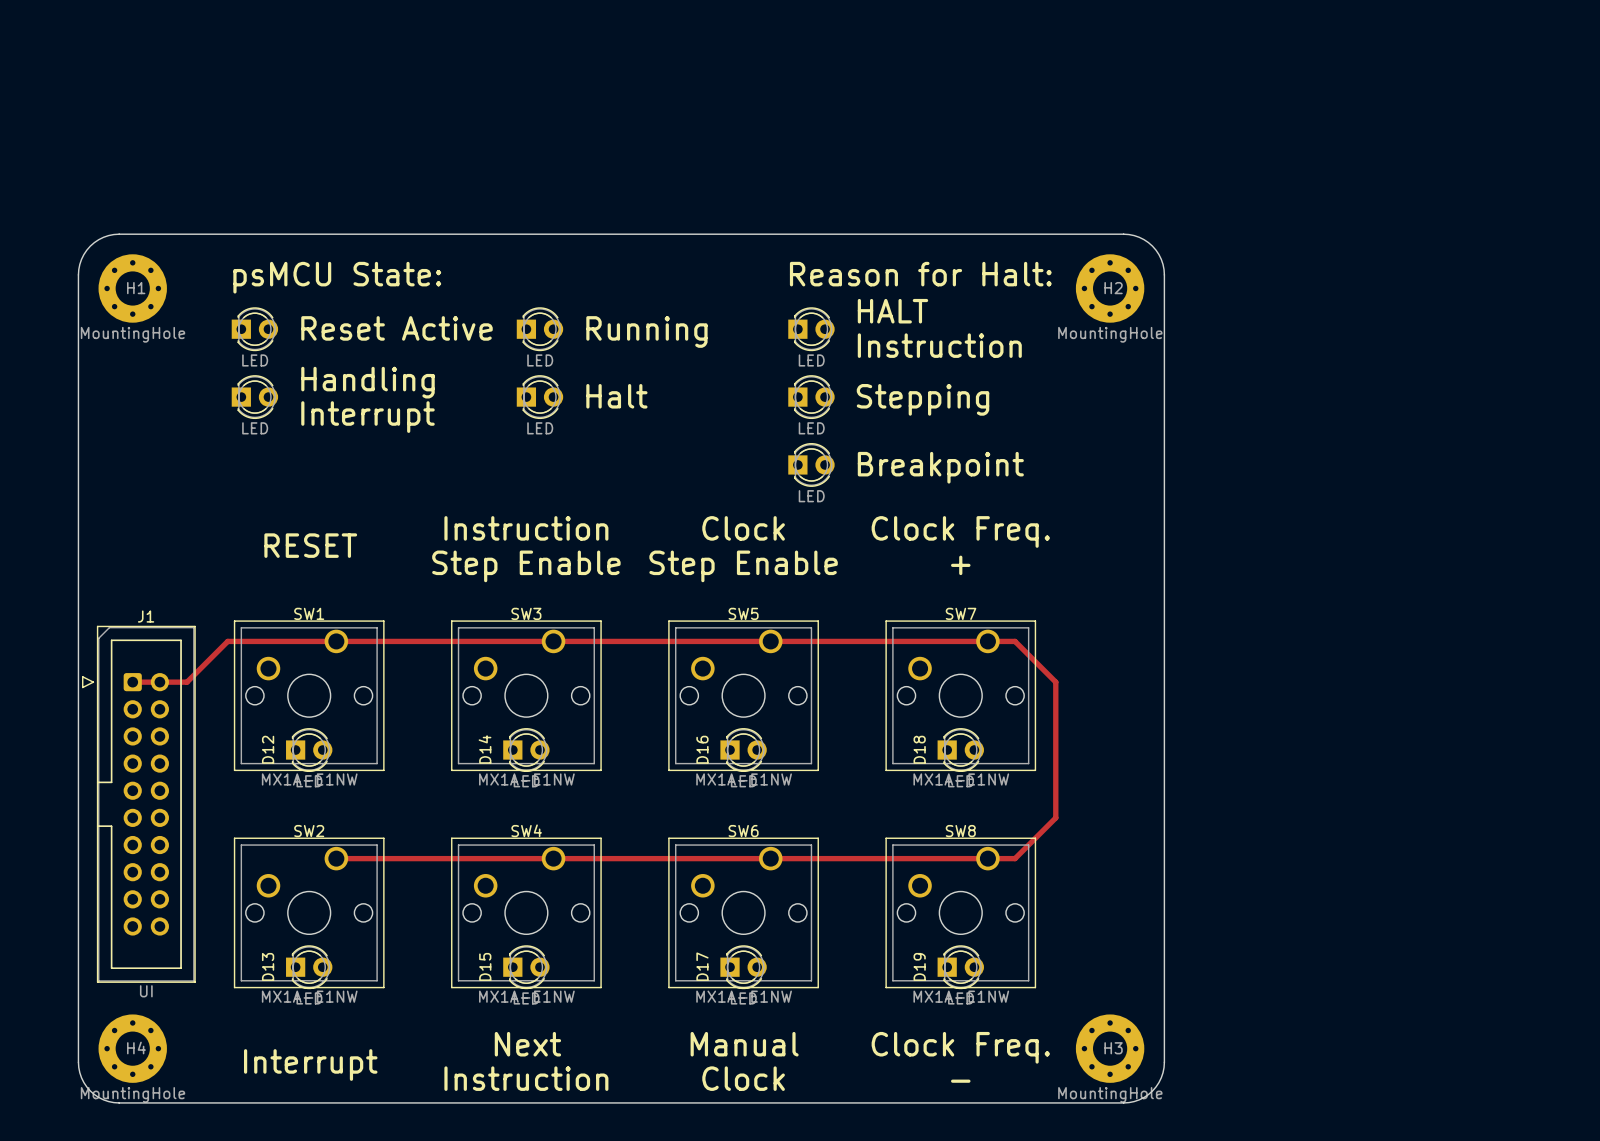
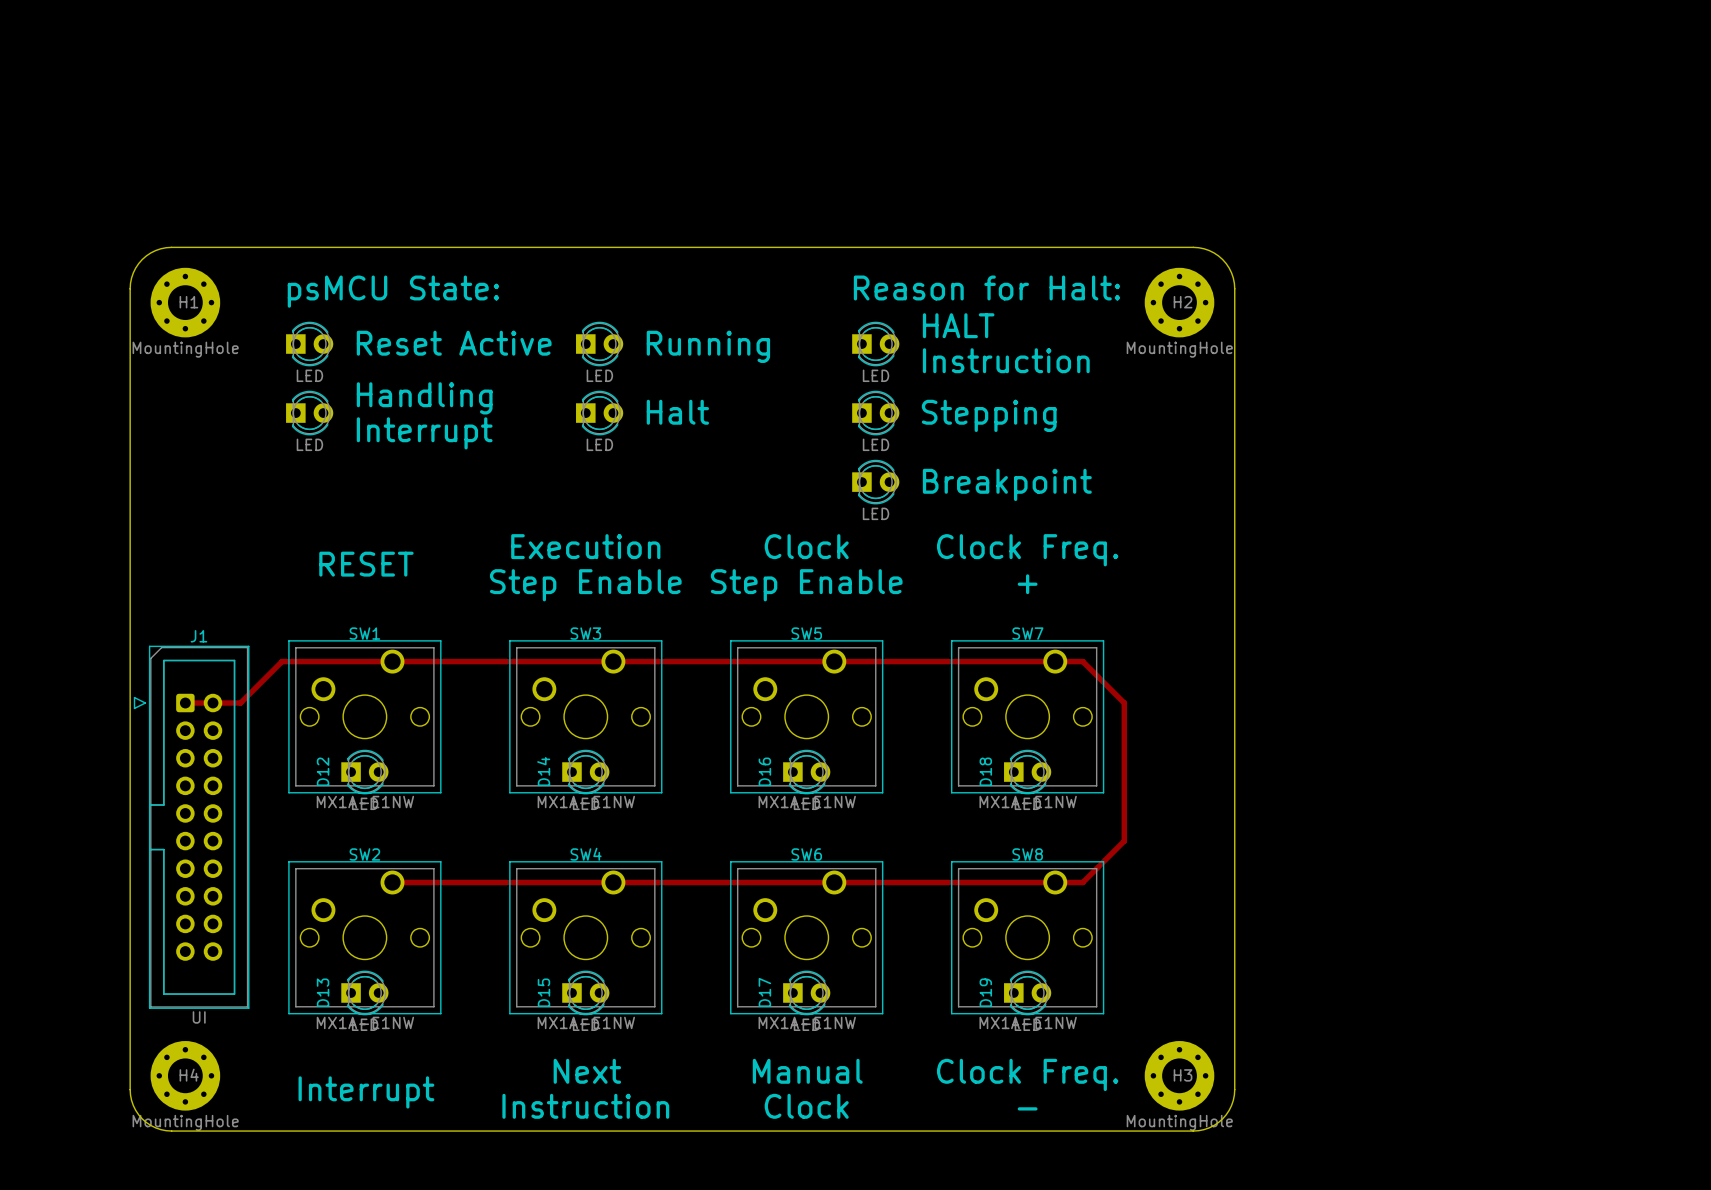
text: Instruction (526, 528) -> Execution (585, 546)

